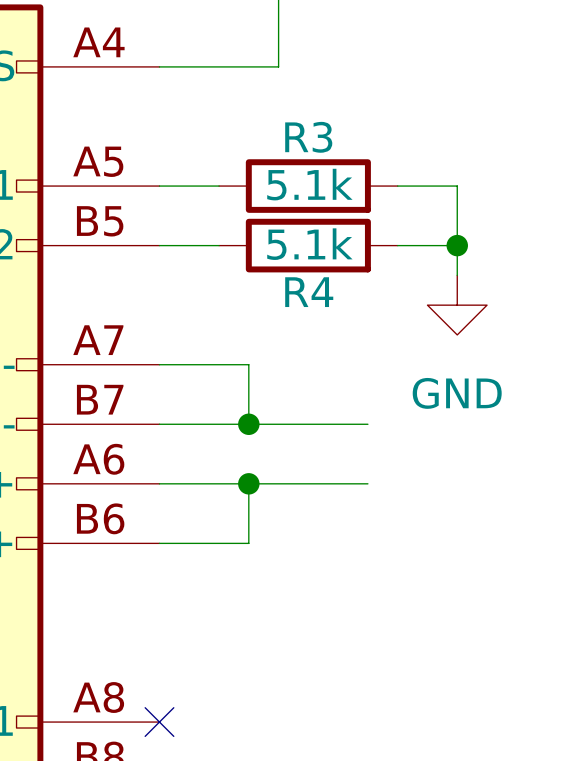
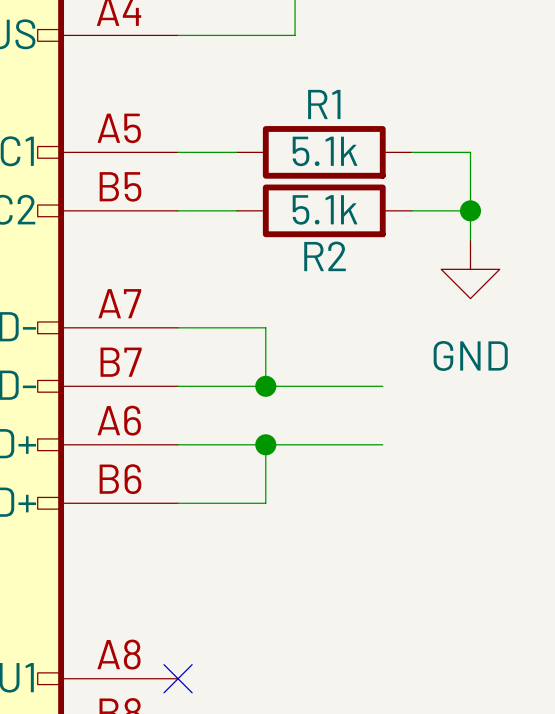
R3 name: R3 (308, 137) -> R1 (324, 104)
R4 name: R4 (309, 292) -> R2 (325, 256)

